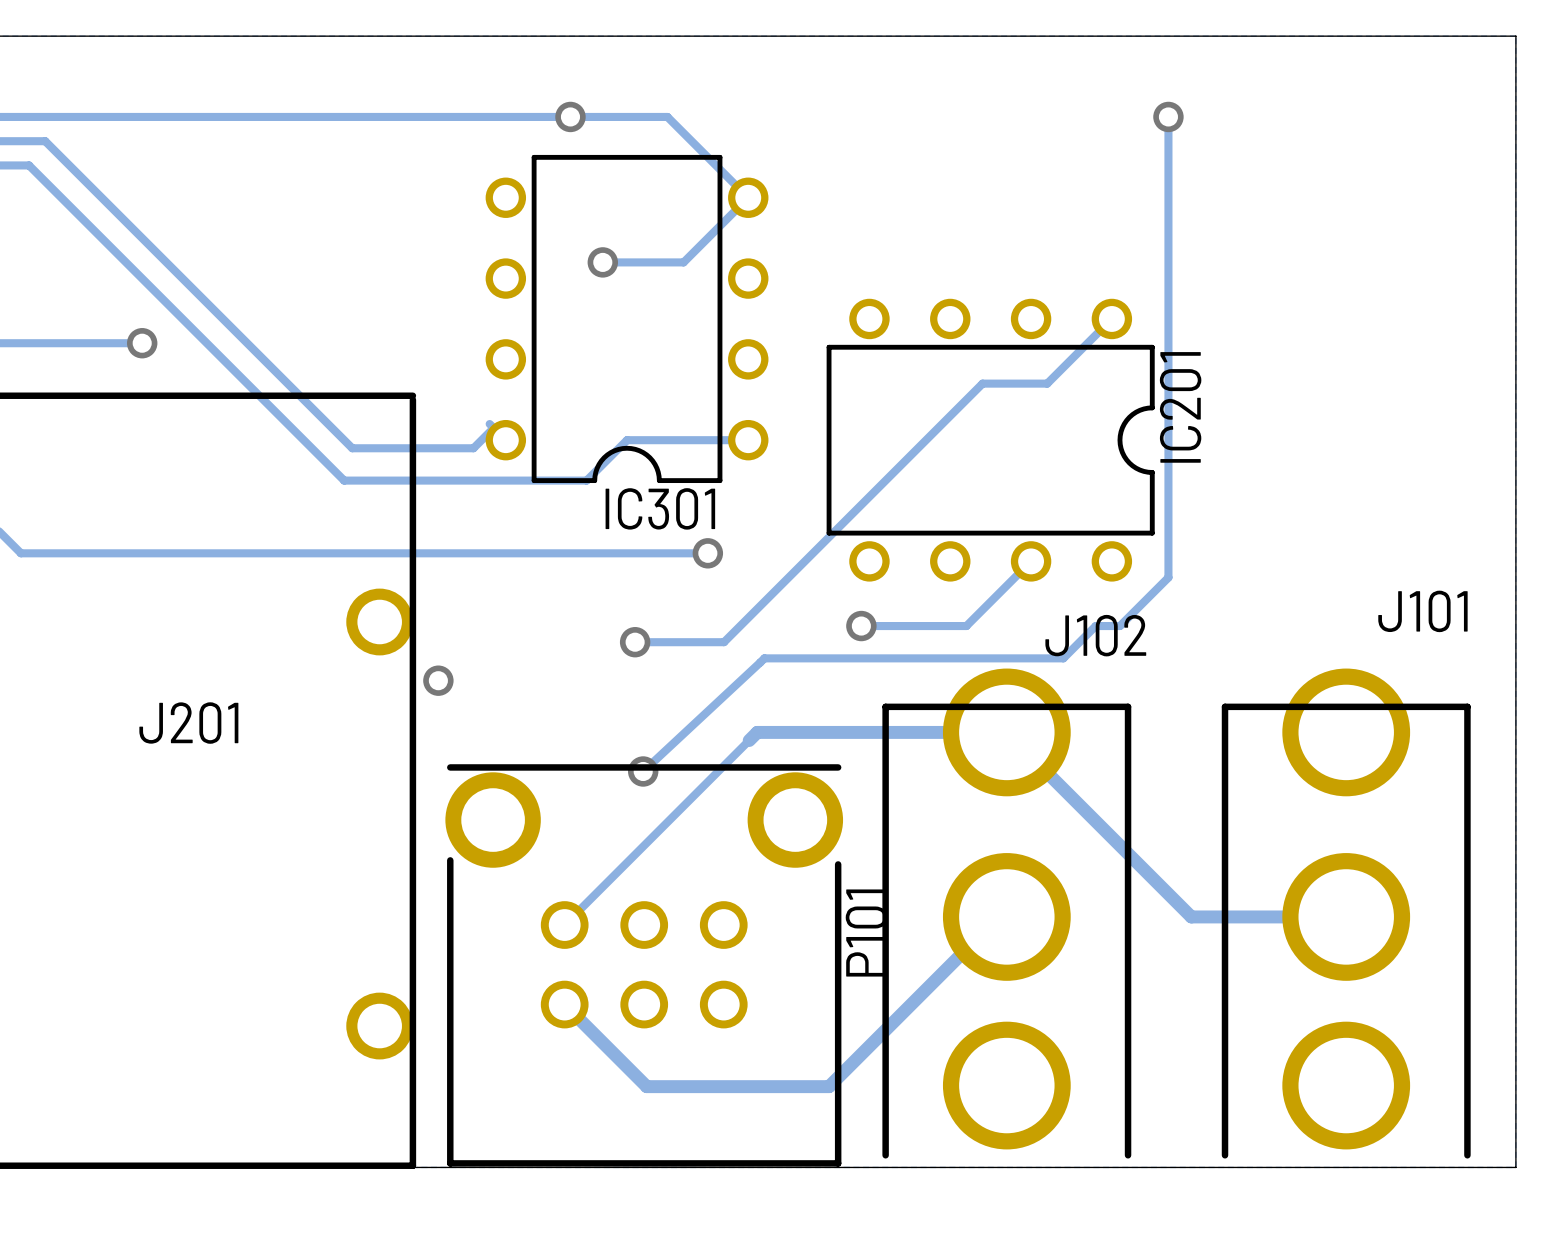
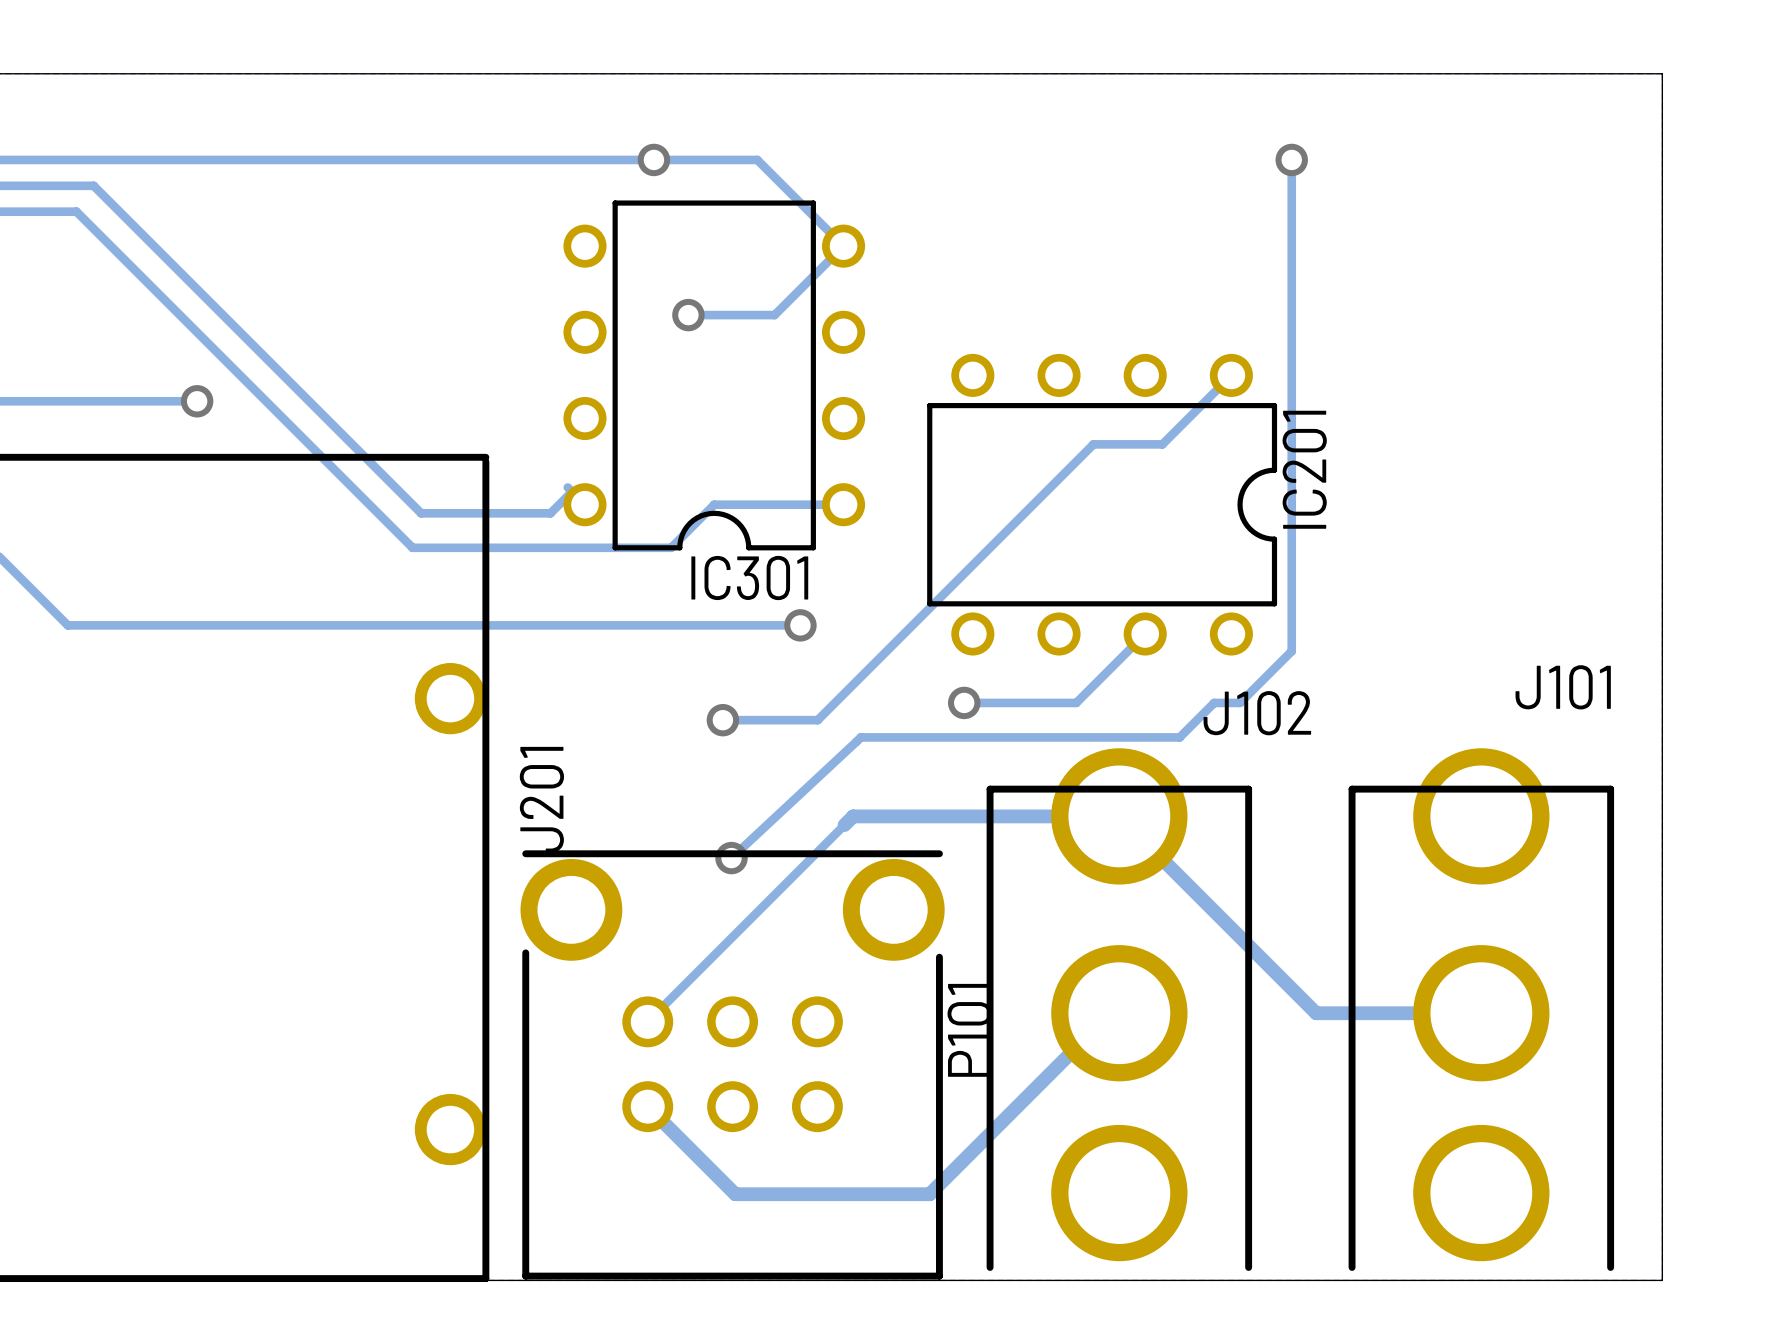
J102 name position: J102 (1095, 635) -> J102 (1257, 713)
via: (438, 680) -> none
J201 name rotation: 0° (188, 723) -> 90° counterclockwise (541, 799)
J201 name position: J201 (188, 723) -> J201 (541, 799)

